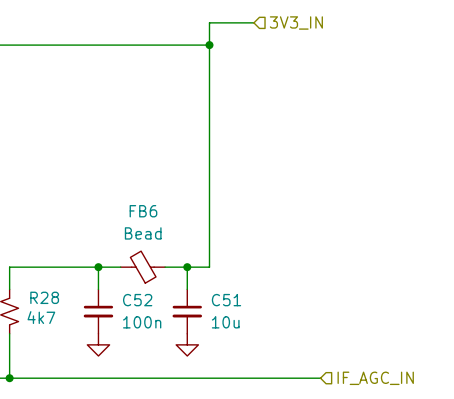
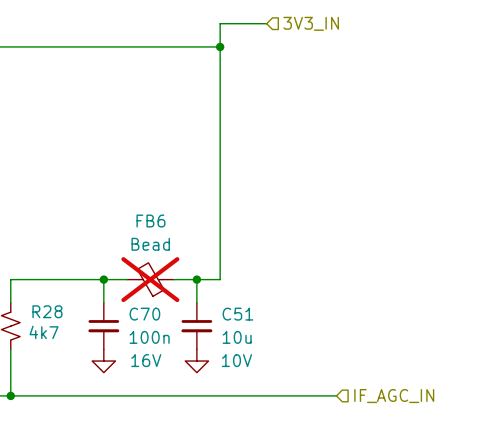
FB6 do-not-place cross: none -> (150, 279)
C52 name: C52 (137, 300) -> C70 (144, 314)
C52 text: none -> 16V (146, 360)
C51 text: none -> 10V (236, 360)

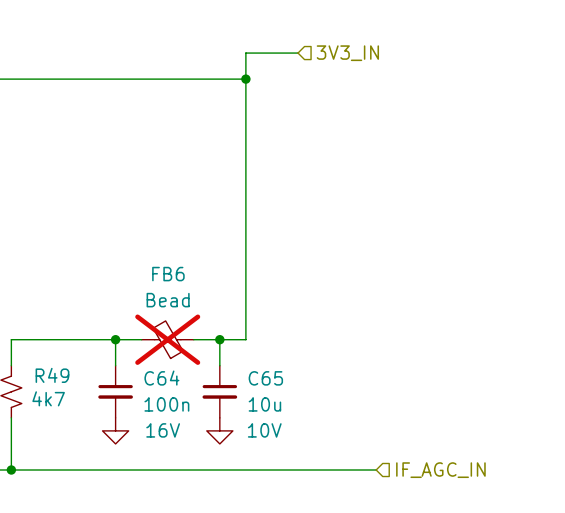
R28 name: R28 (47, 311) -> R49 (52, 375)
C70 name: C70 (144, 314) -> C64 (161, 378)
C51 name: C51 (237, 314) -> C65 (265, 378)

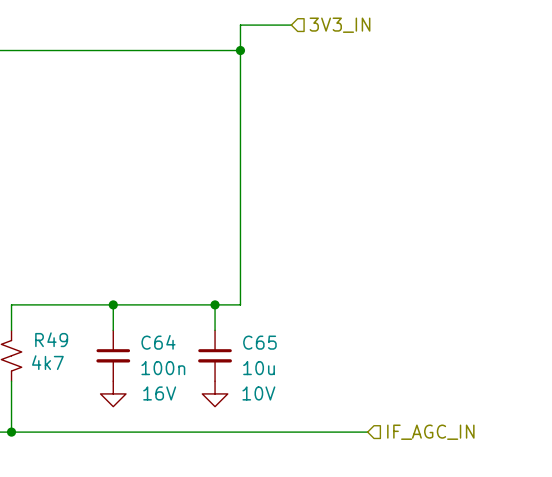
FB6: Bead (167, 339) -> none

